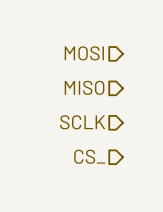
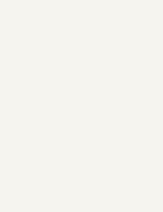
hierarchical label: MOSI (84, 53) -> none
hierarchical label: MISO (84, 87) -> none
hierarchical label: SCLK (82, 122) -> none
hierarchical label: CS_ (89, 156) -> none

